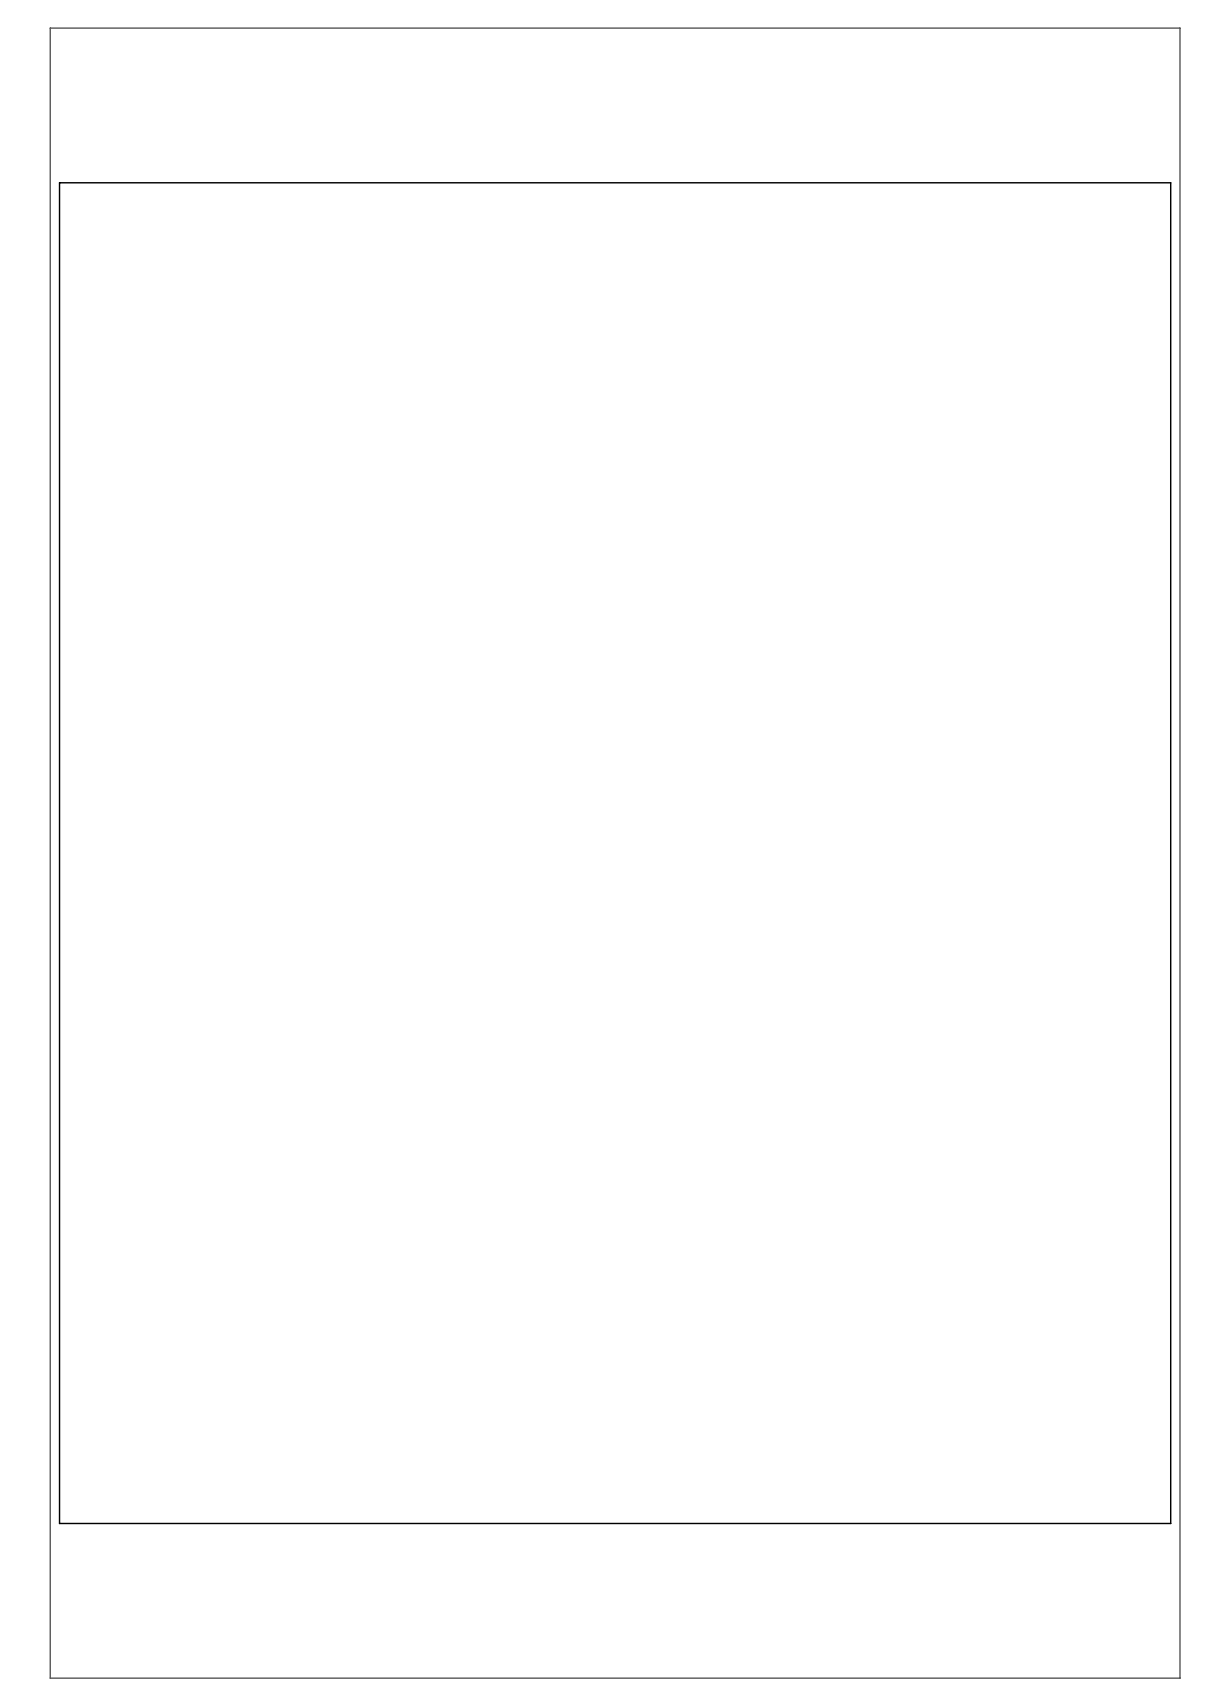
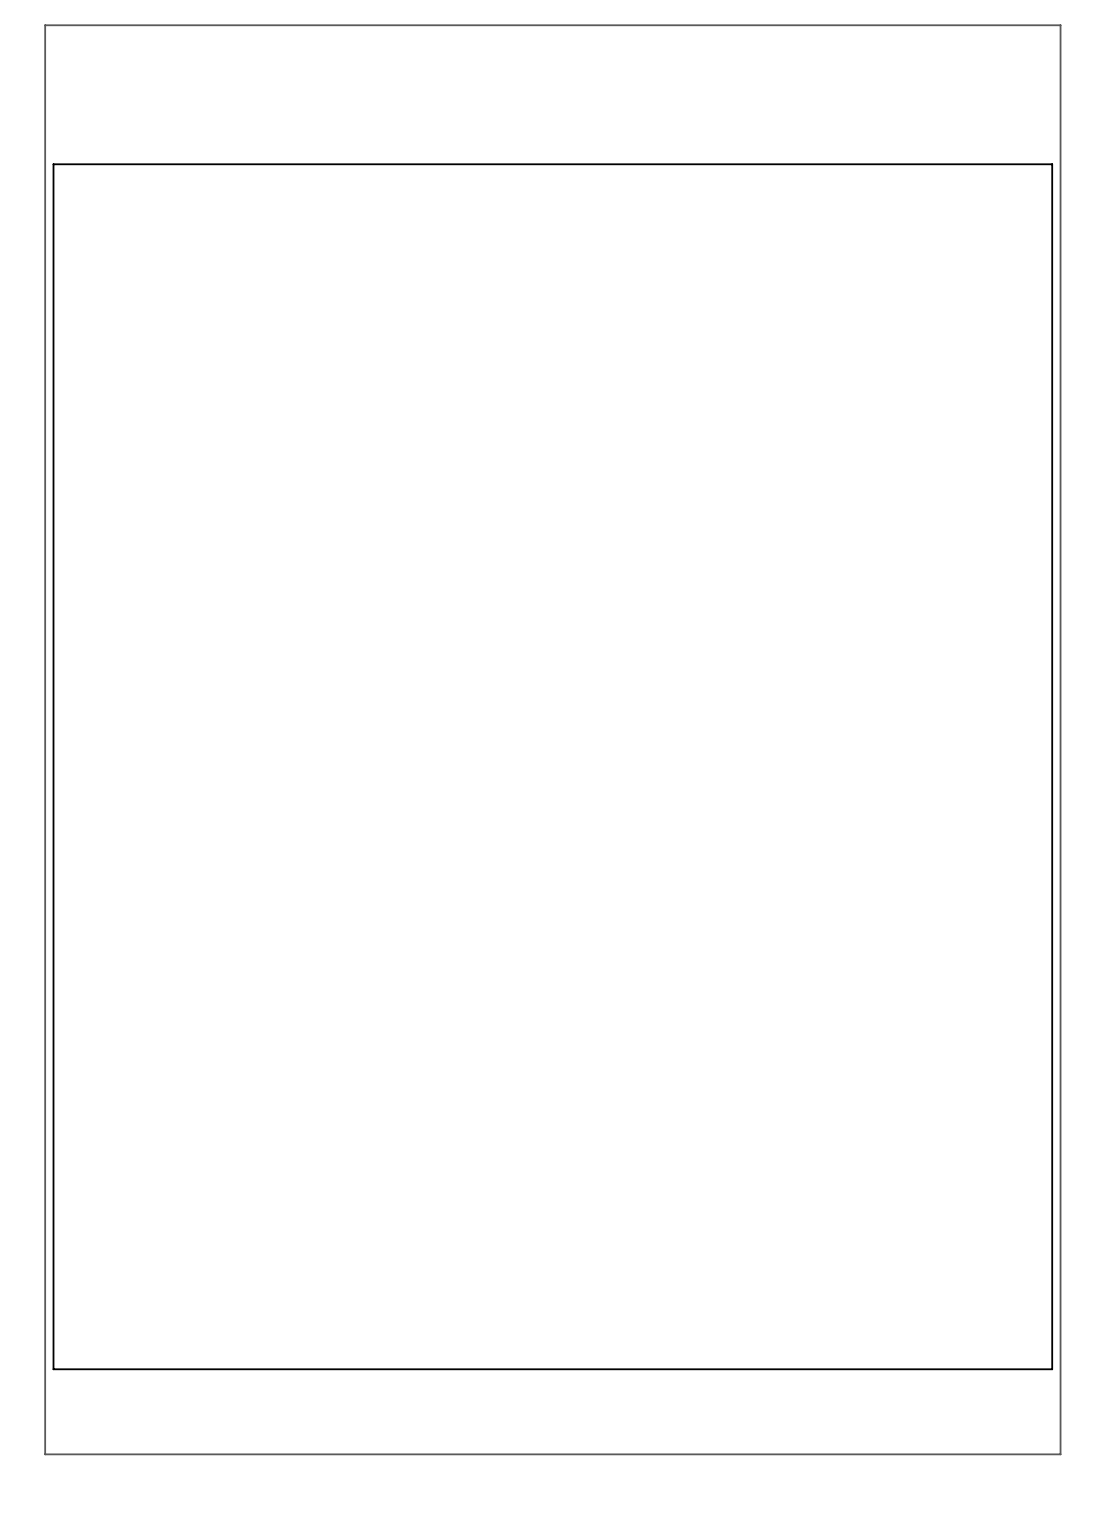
line: (50, 1618) (50, 1678) (1179, 1678) (1179, 1618) -> (45, 1454) (1060, 1454)

